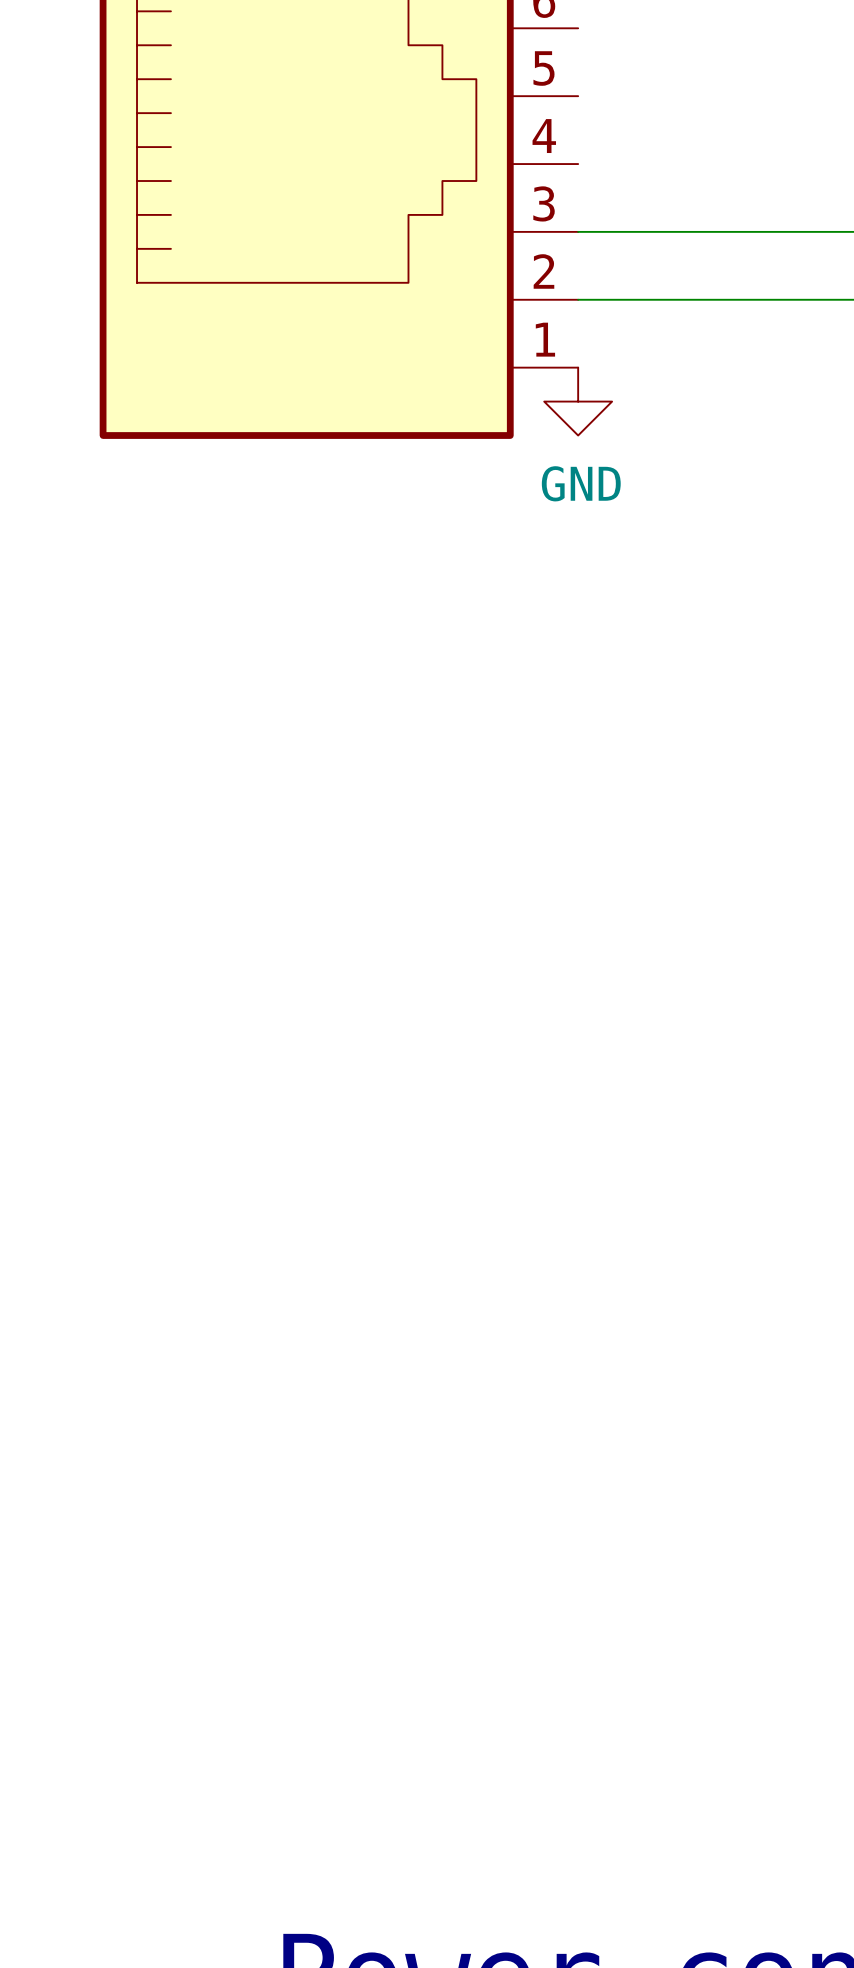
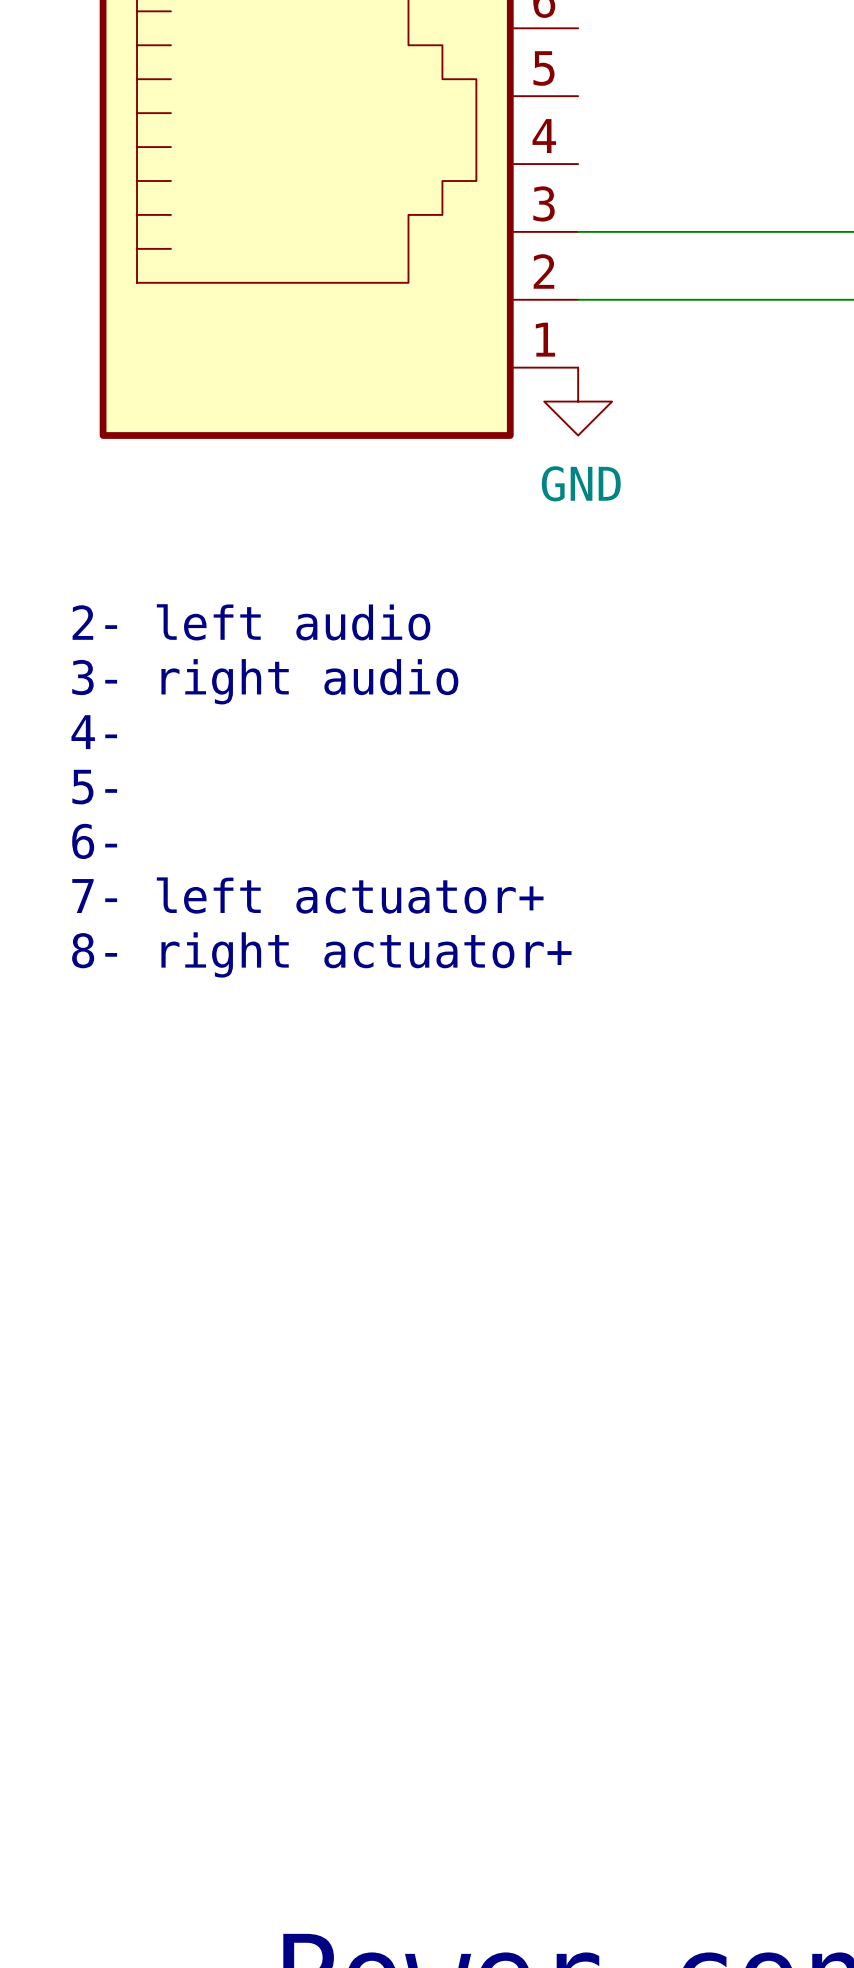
text: none -> 2- left audio (251, 622)
text: none -> 3- right audio (265, 681)
text: none -> 4- (94, 732)
text: none -> 5- (94, 787)
text: none -> 6- (94, 841)
text: none -> 7- left actuator+ (307, 895)
text: none -> 8- right actuator+ (321, 954)

